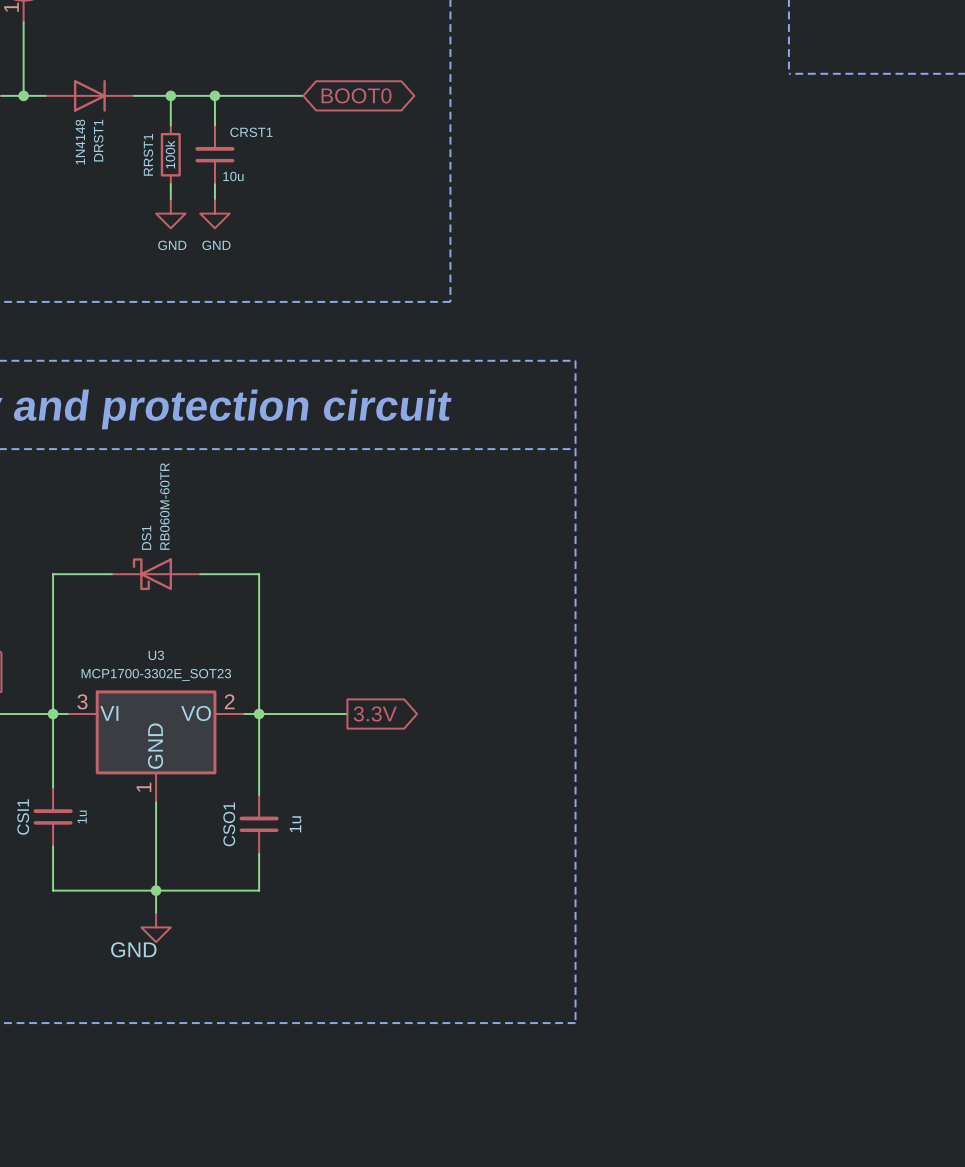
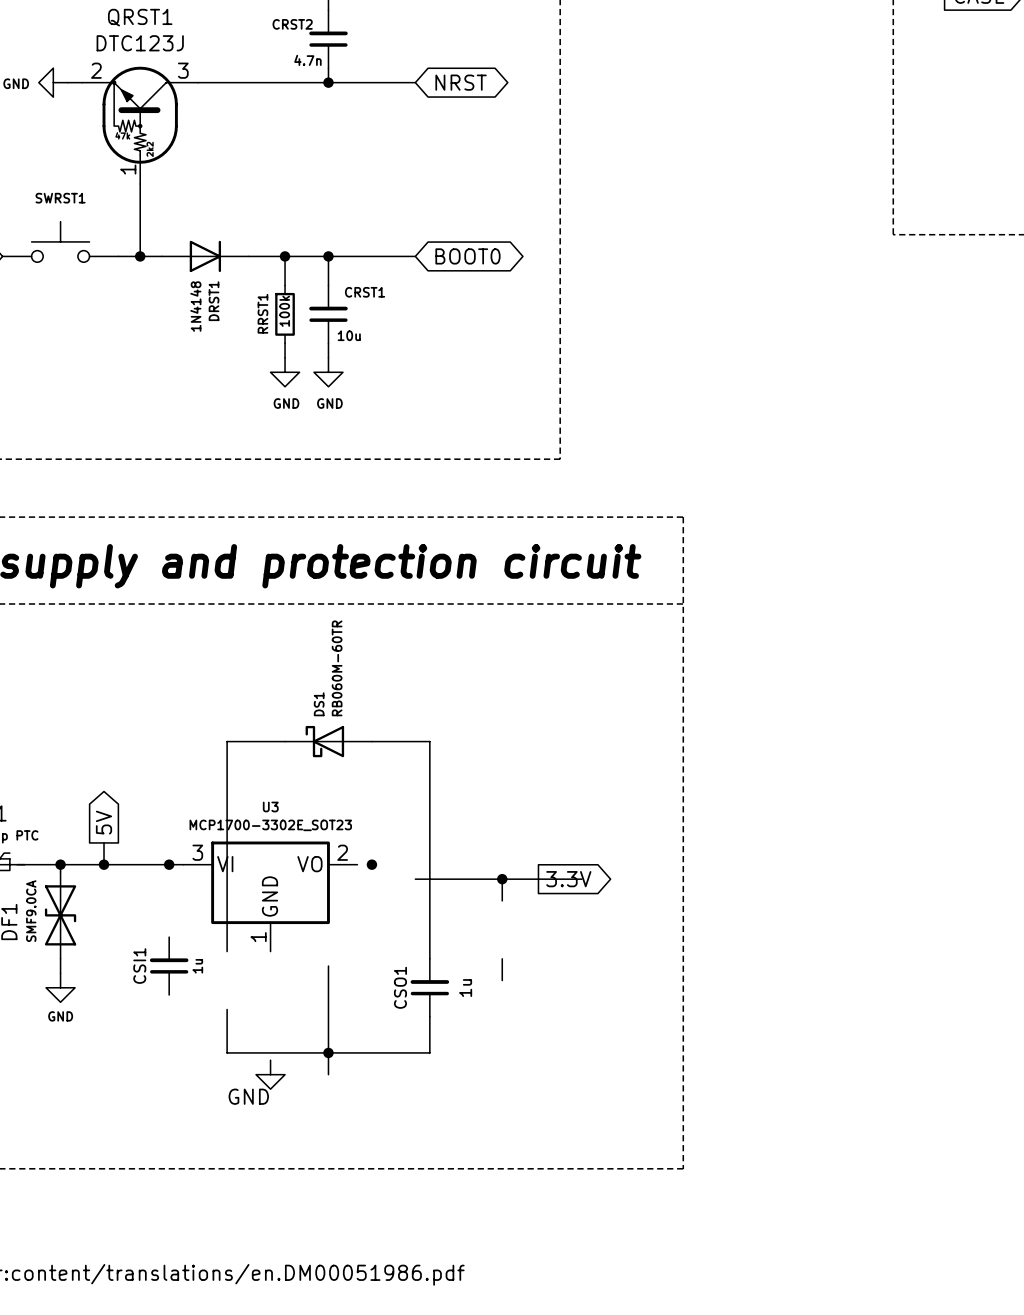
wire: (111, 574) (53, 574) (53, 787) -> (285, 741) (227, 741) (227, 951)
DS1 position: (156, 574) -> (328, 741)
wire: (200, 574) (259, 574) (259, 794) -> (371, 741) (429, 741) (429, 958)
wire: (244, 714) (347, 714) -> none
global label position: 3.3V (375, 714) -> 3.3V (568, 879)
wire: none -> (415, 879) (581, 879)
wire: none -> (502, 879) (502, 900)
junction: none -> (502, 879)
wire: (156, 802) (156, 912) -> (328, 966) (328, 1074)
wire: none -> (502, 958) (502, 980)
CSO1 position: (259, 824) -> (429, 987)
wire: (53, 846) (53, 890) (259, 890) (259, 853) -> (227, 1009) (227, 1052) (429, 1052) (429, 1016)
junction position: (156, 890) -> (328, 1052)

